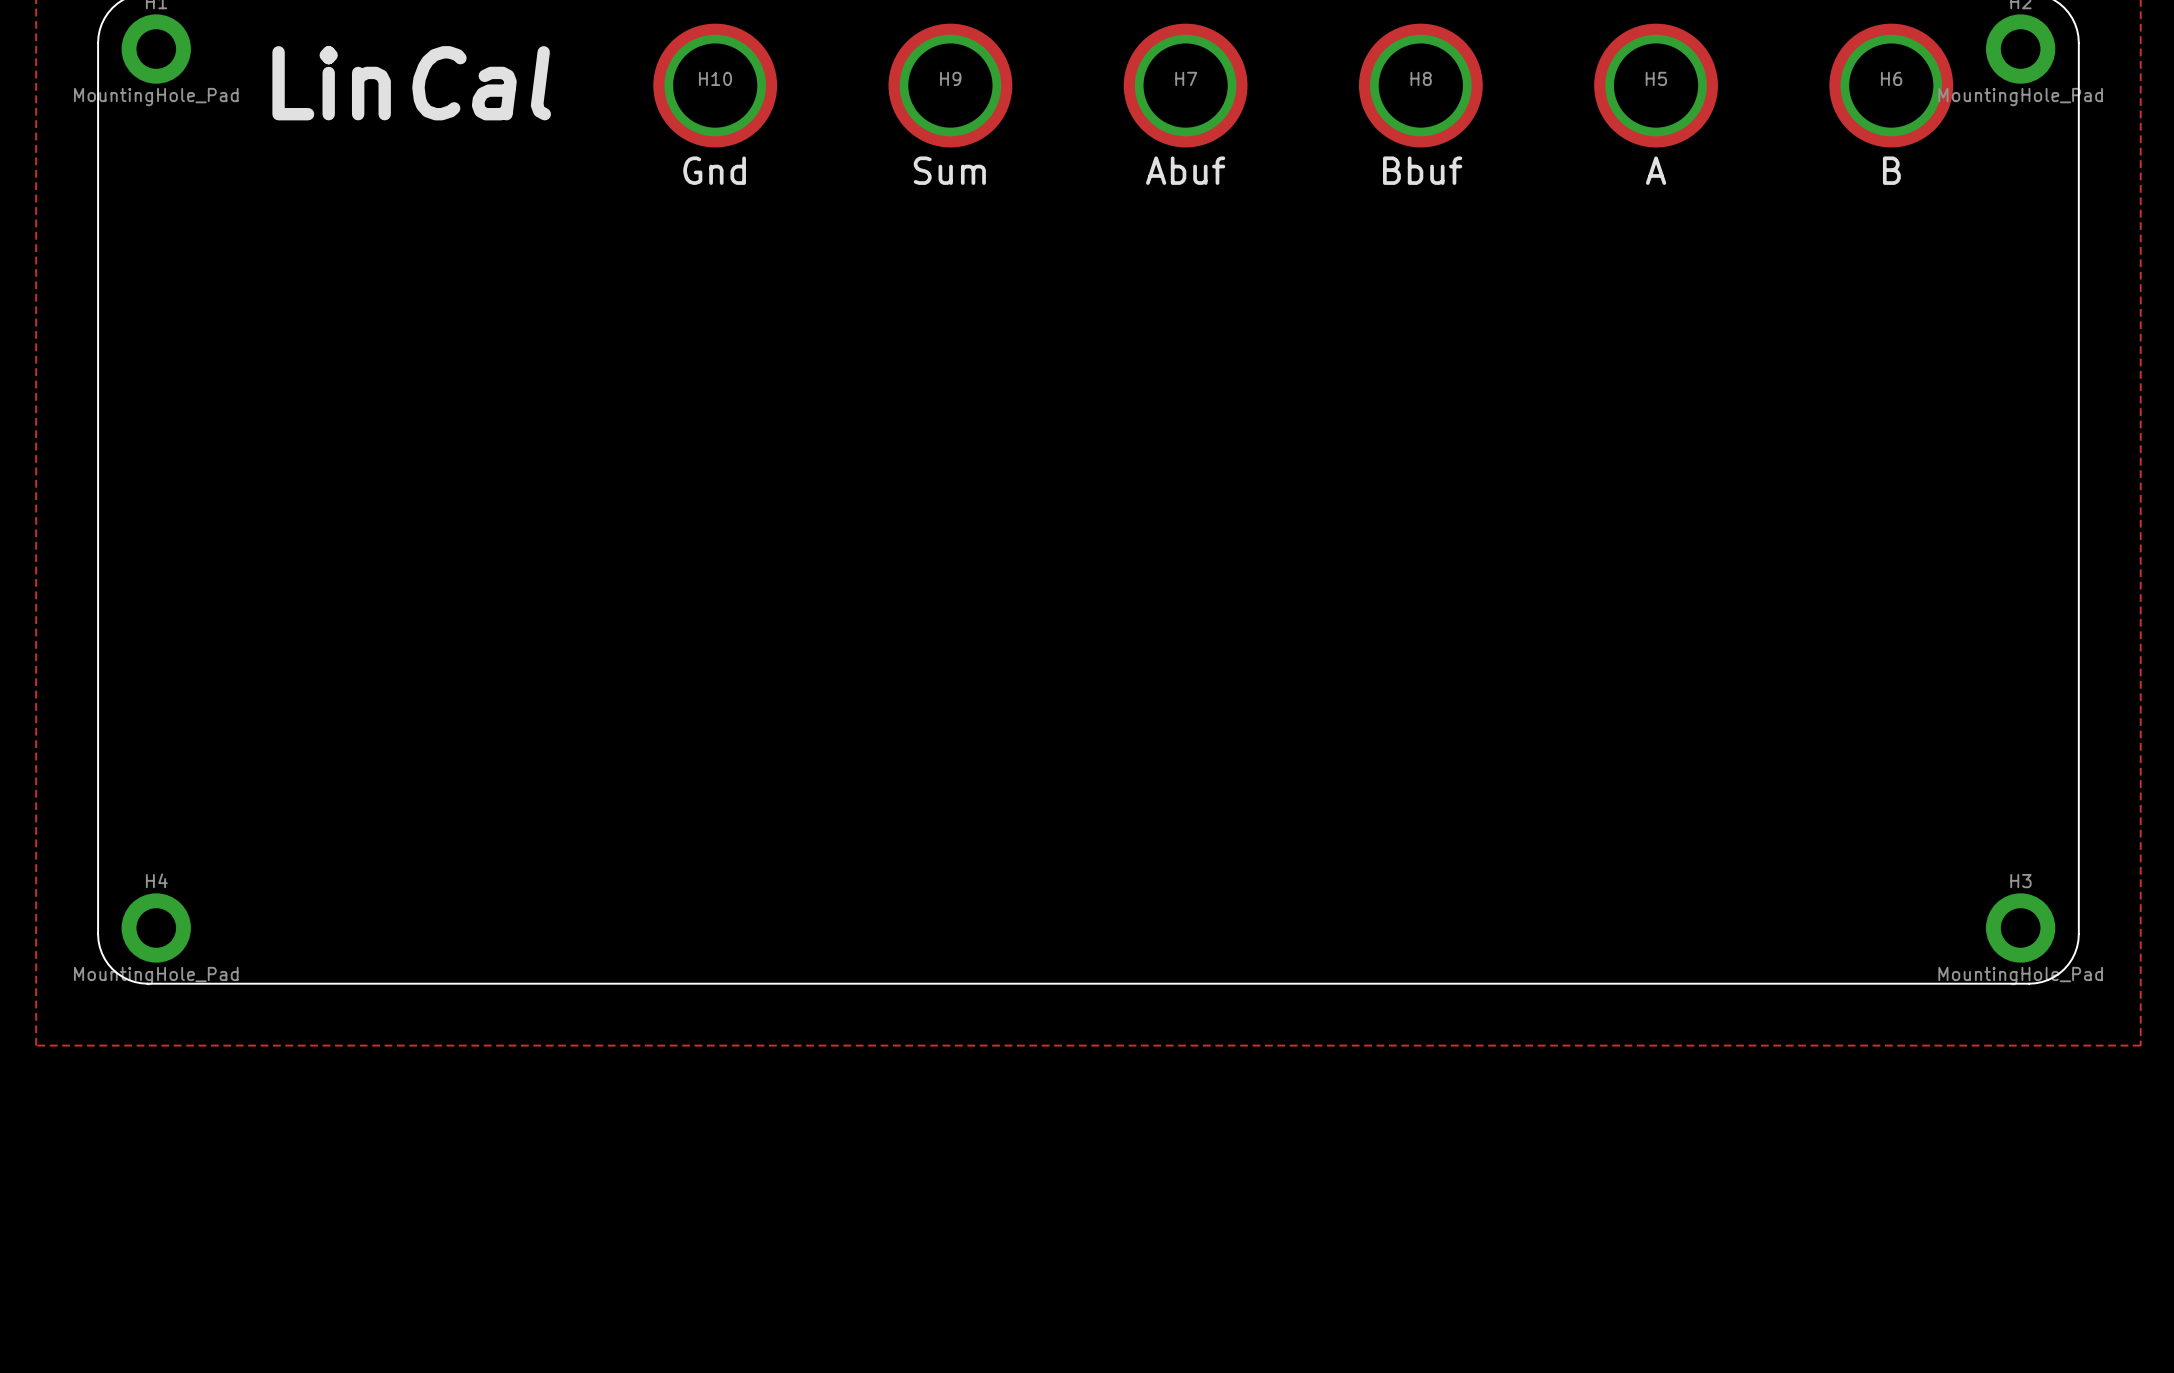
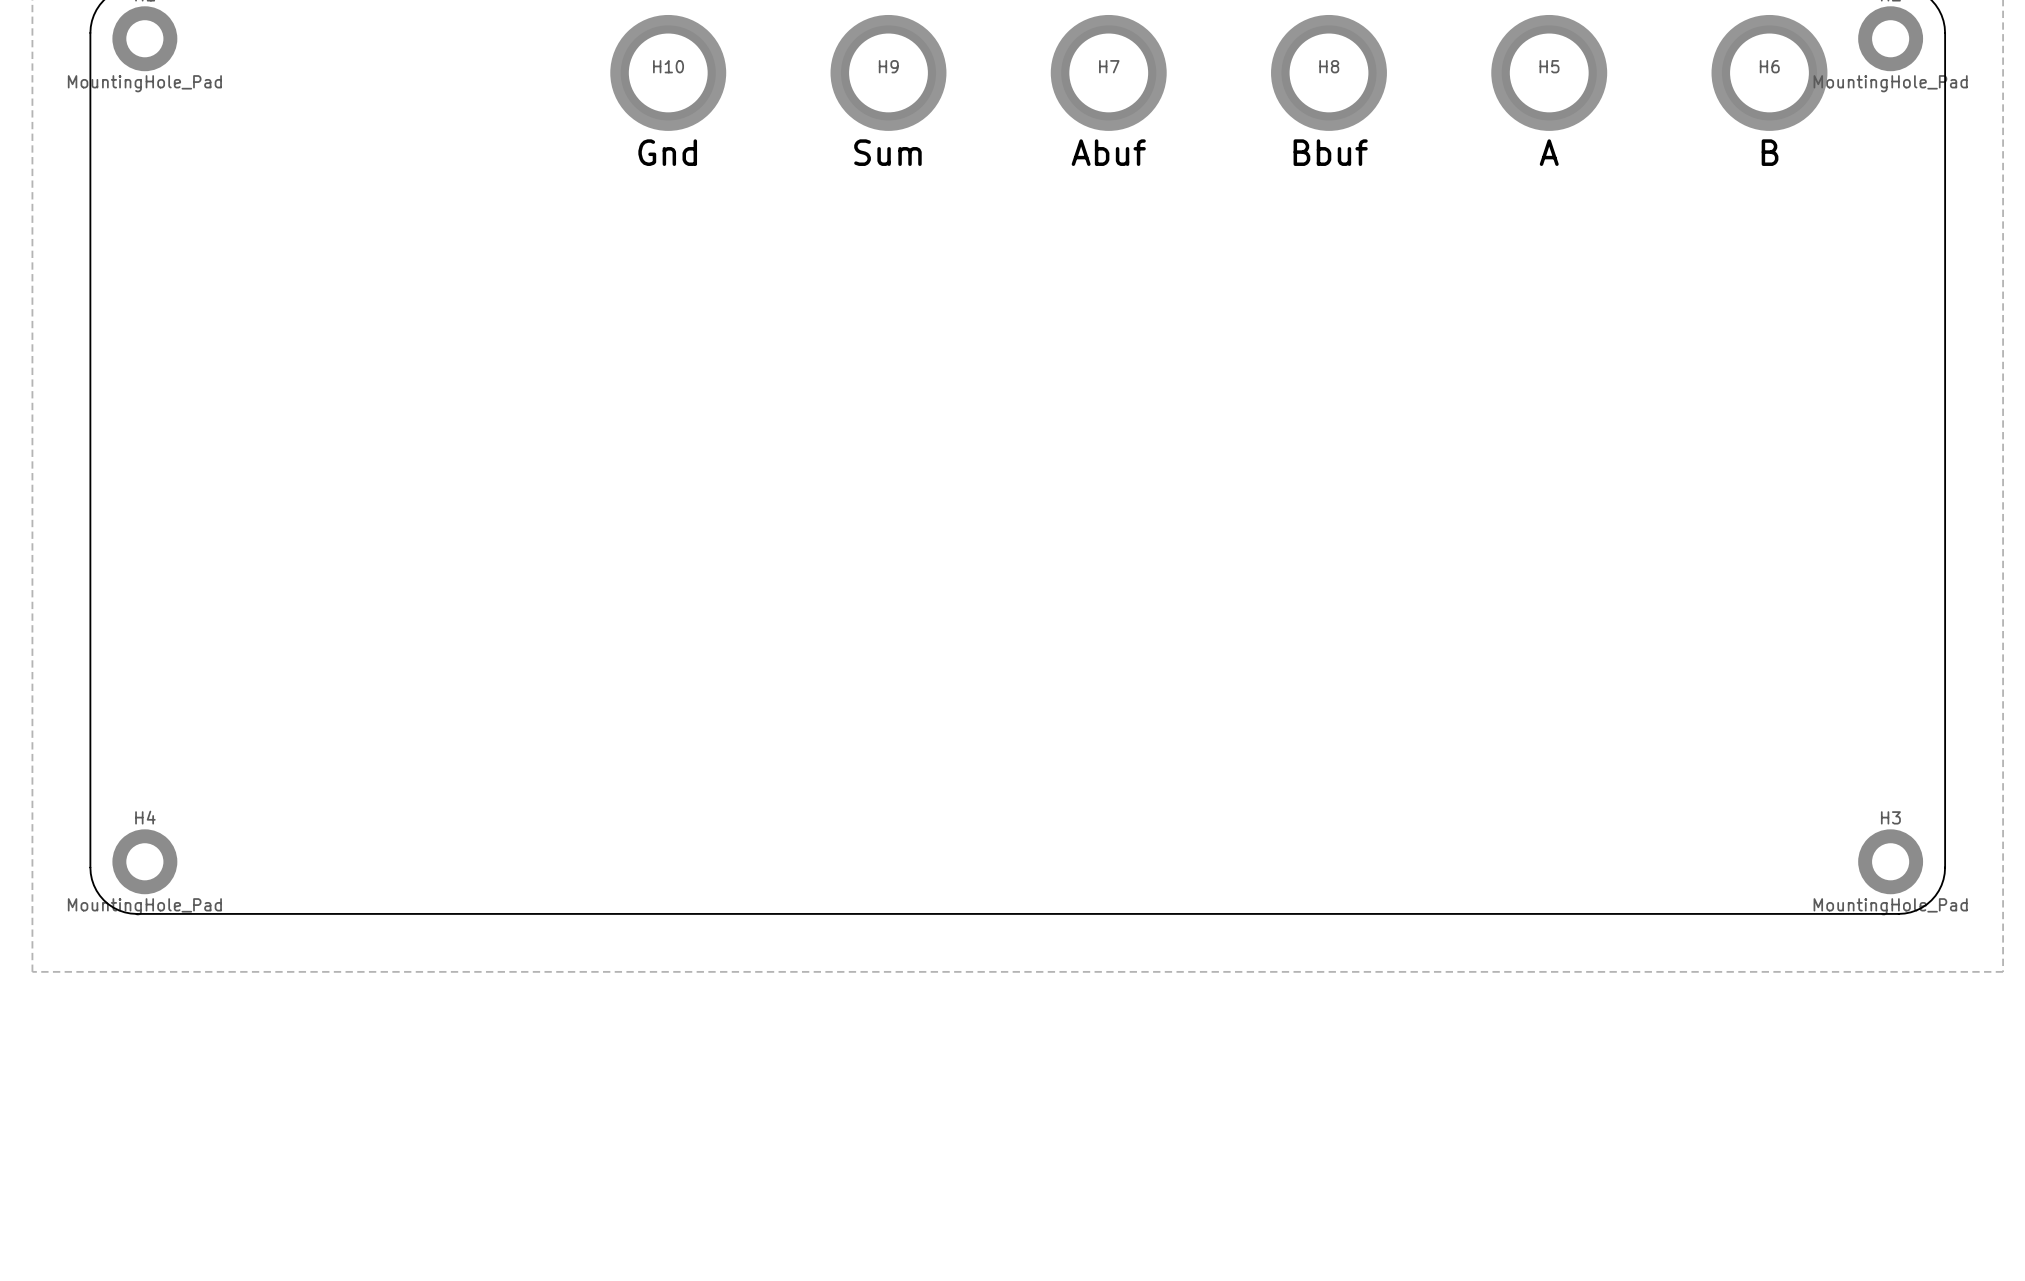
text: Lin (331, 83) -> none
text: Cal (481, 83) -> none

